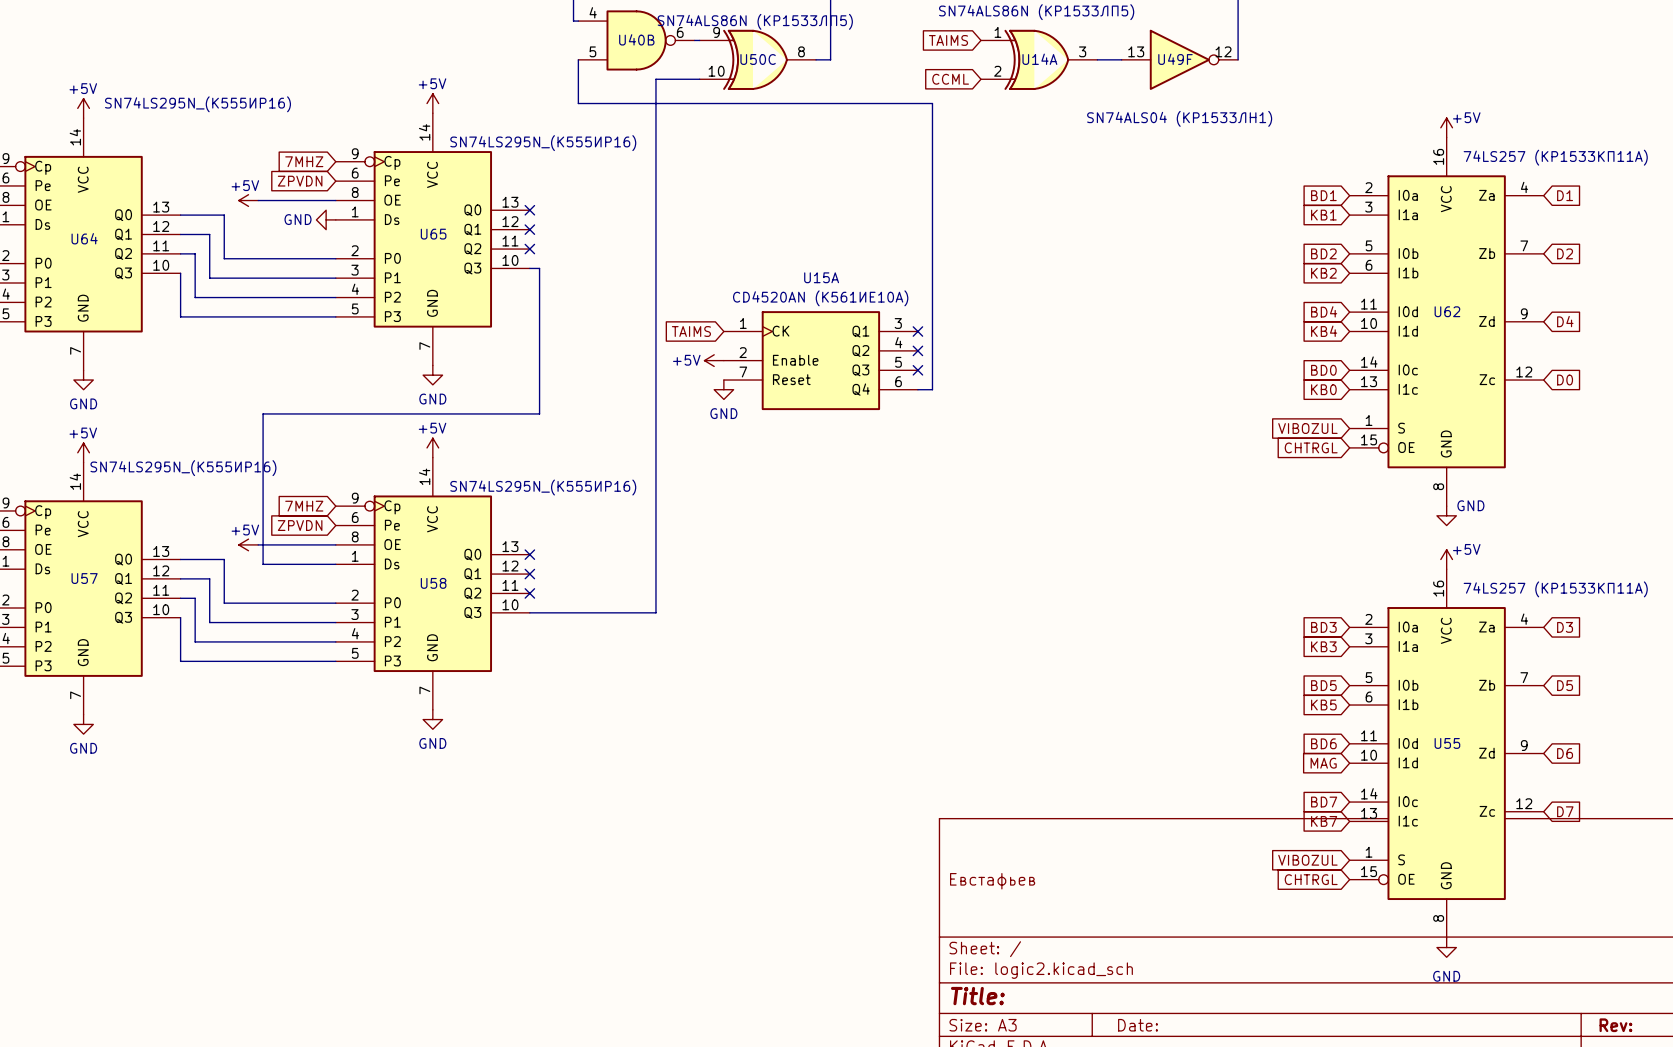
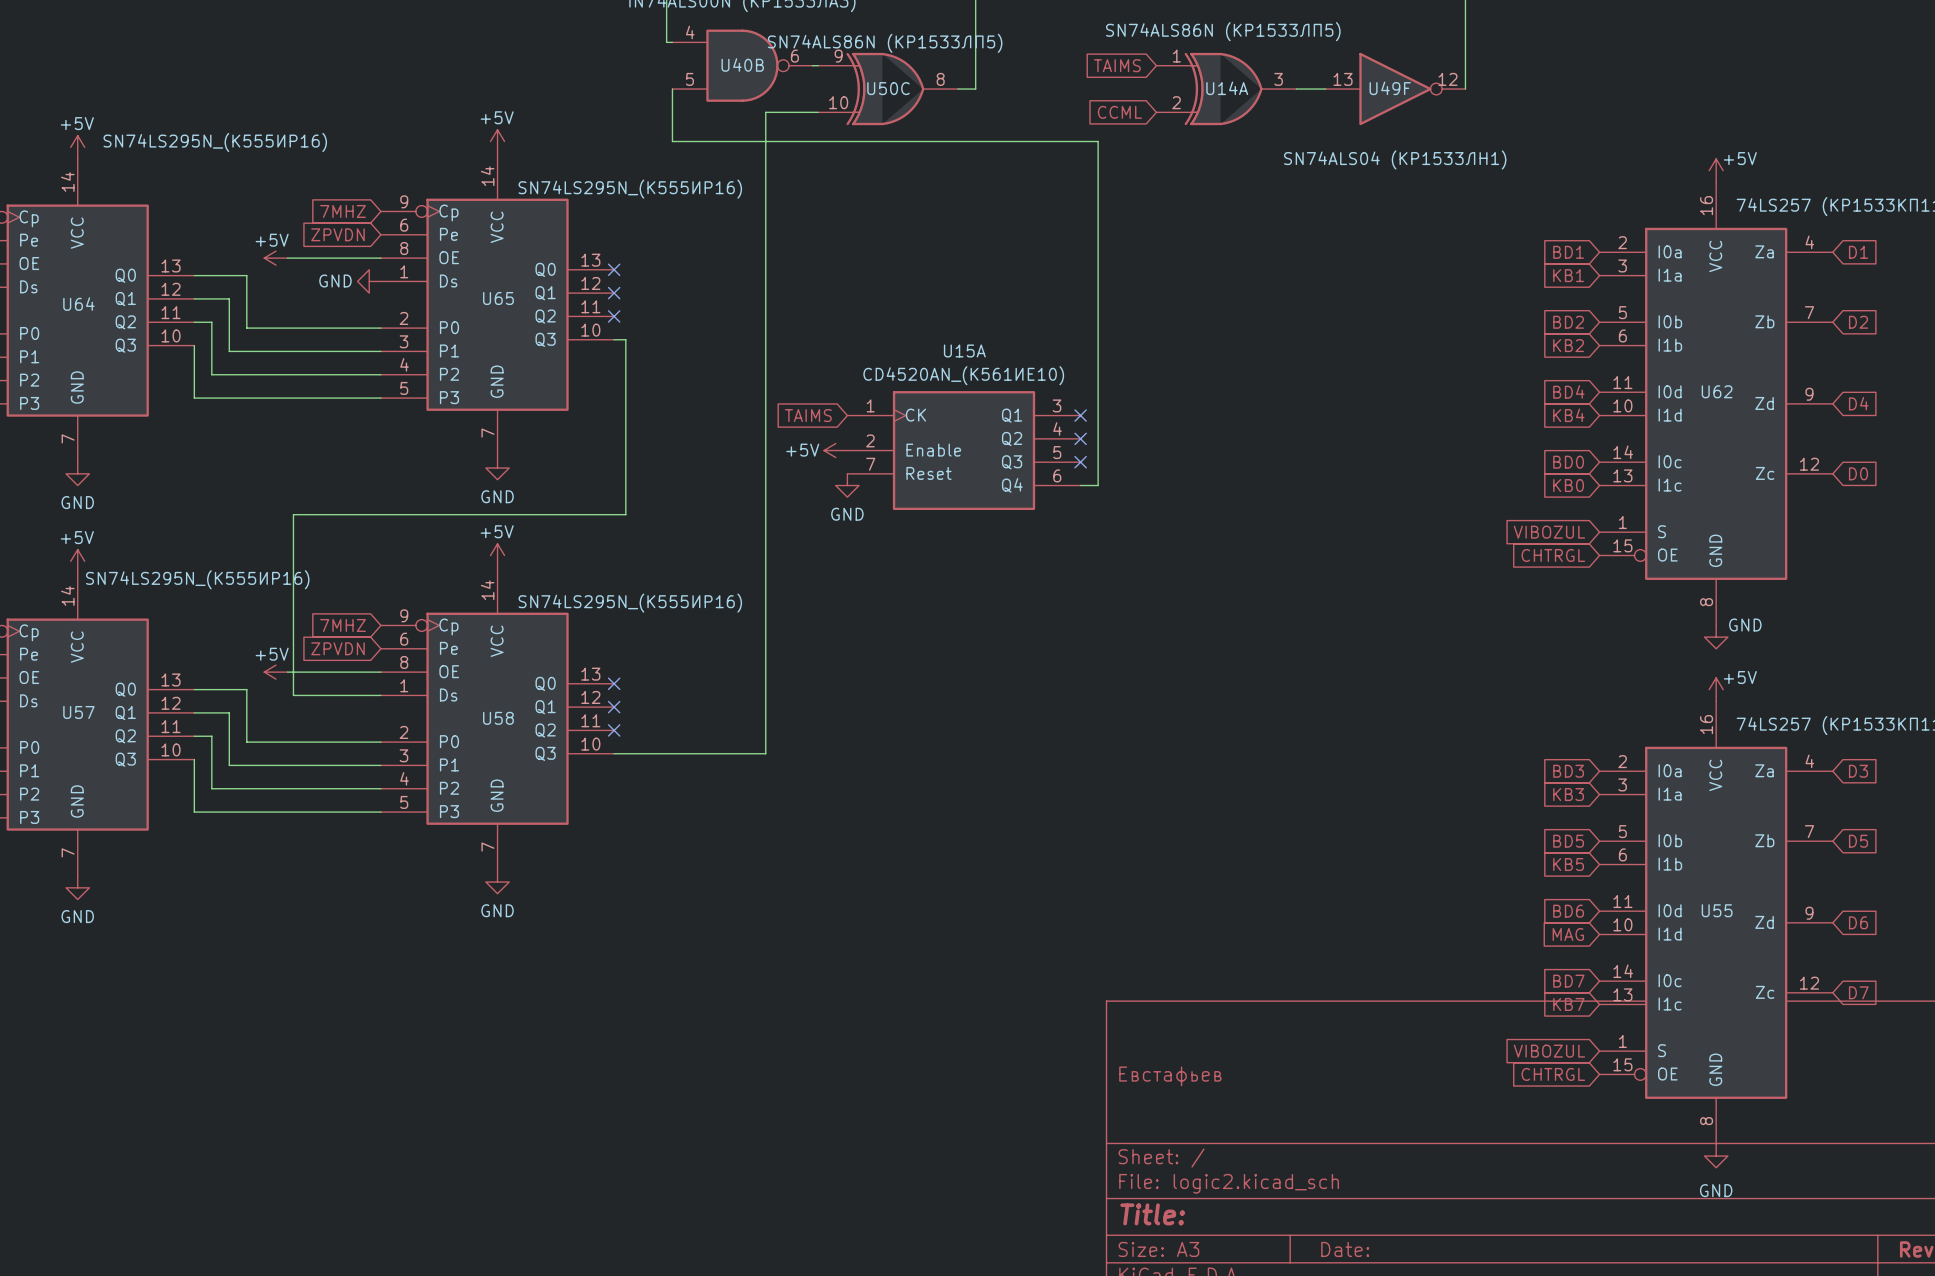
U15A value: CD4520АN (К561ИЕ10A) (820, 298) -> CD4520АN_(К561ИЕ10) (963, 375)

